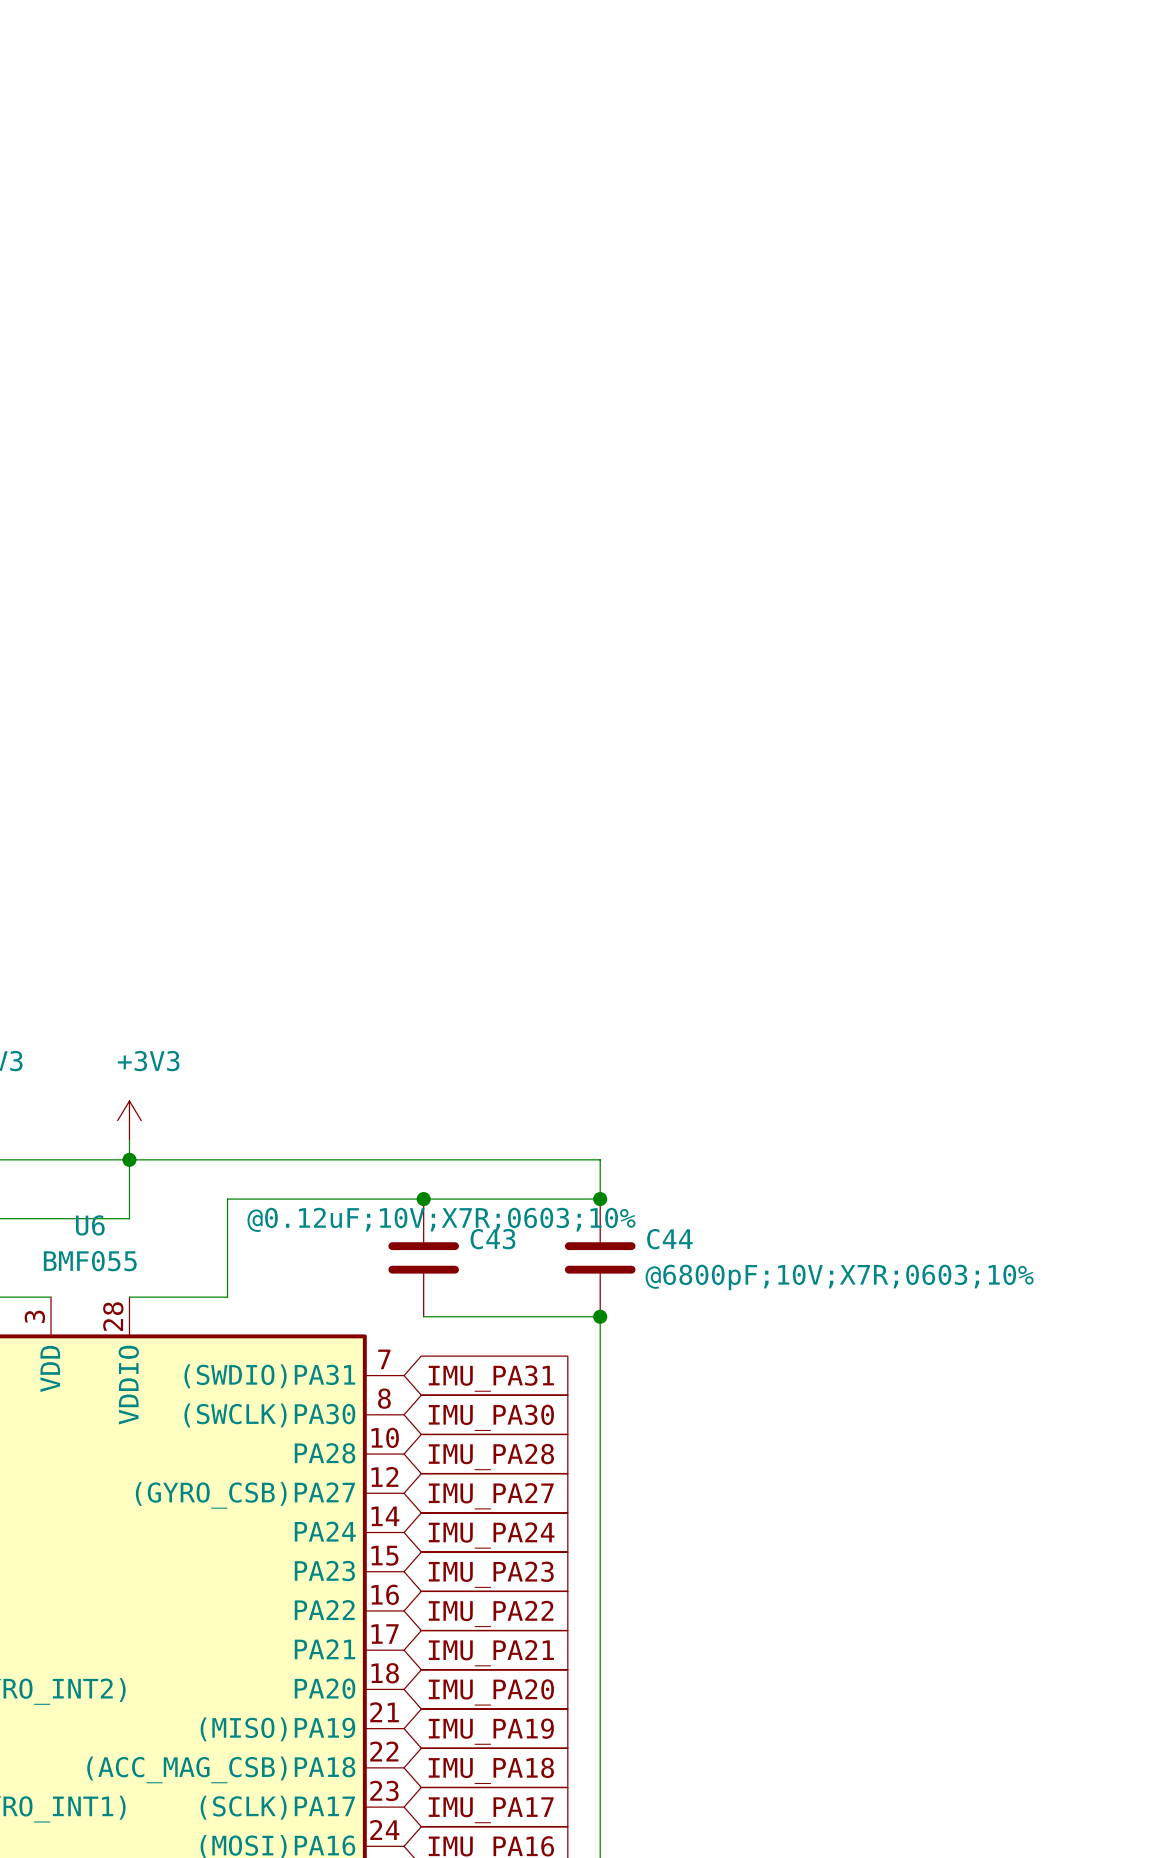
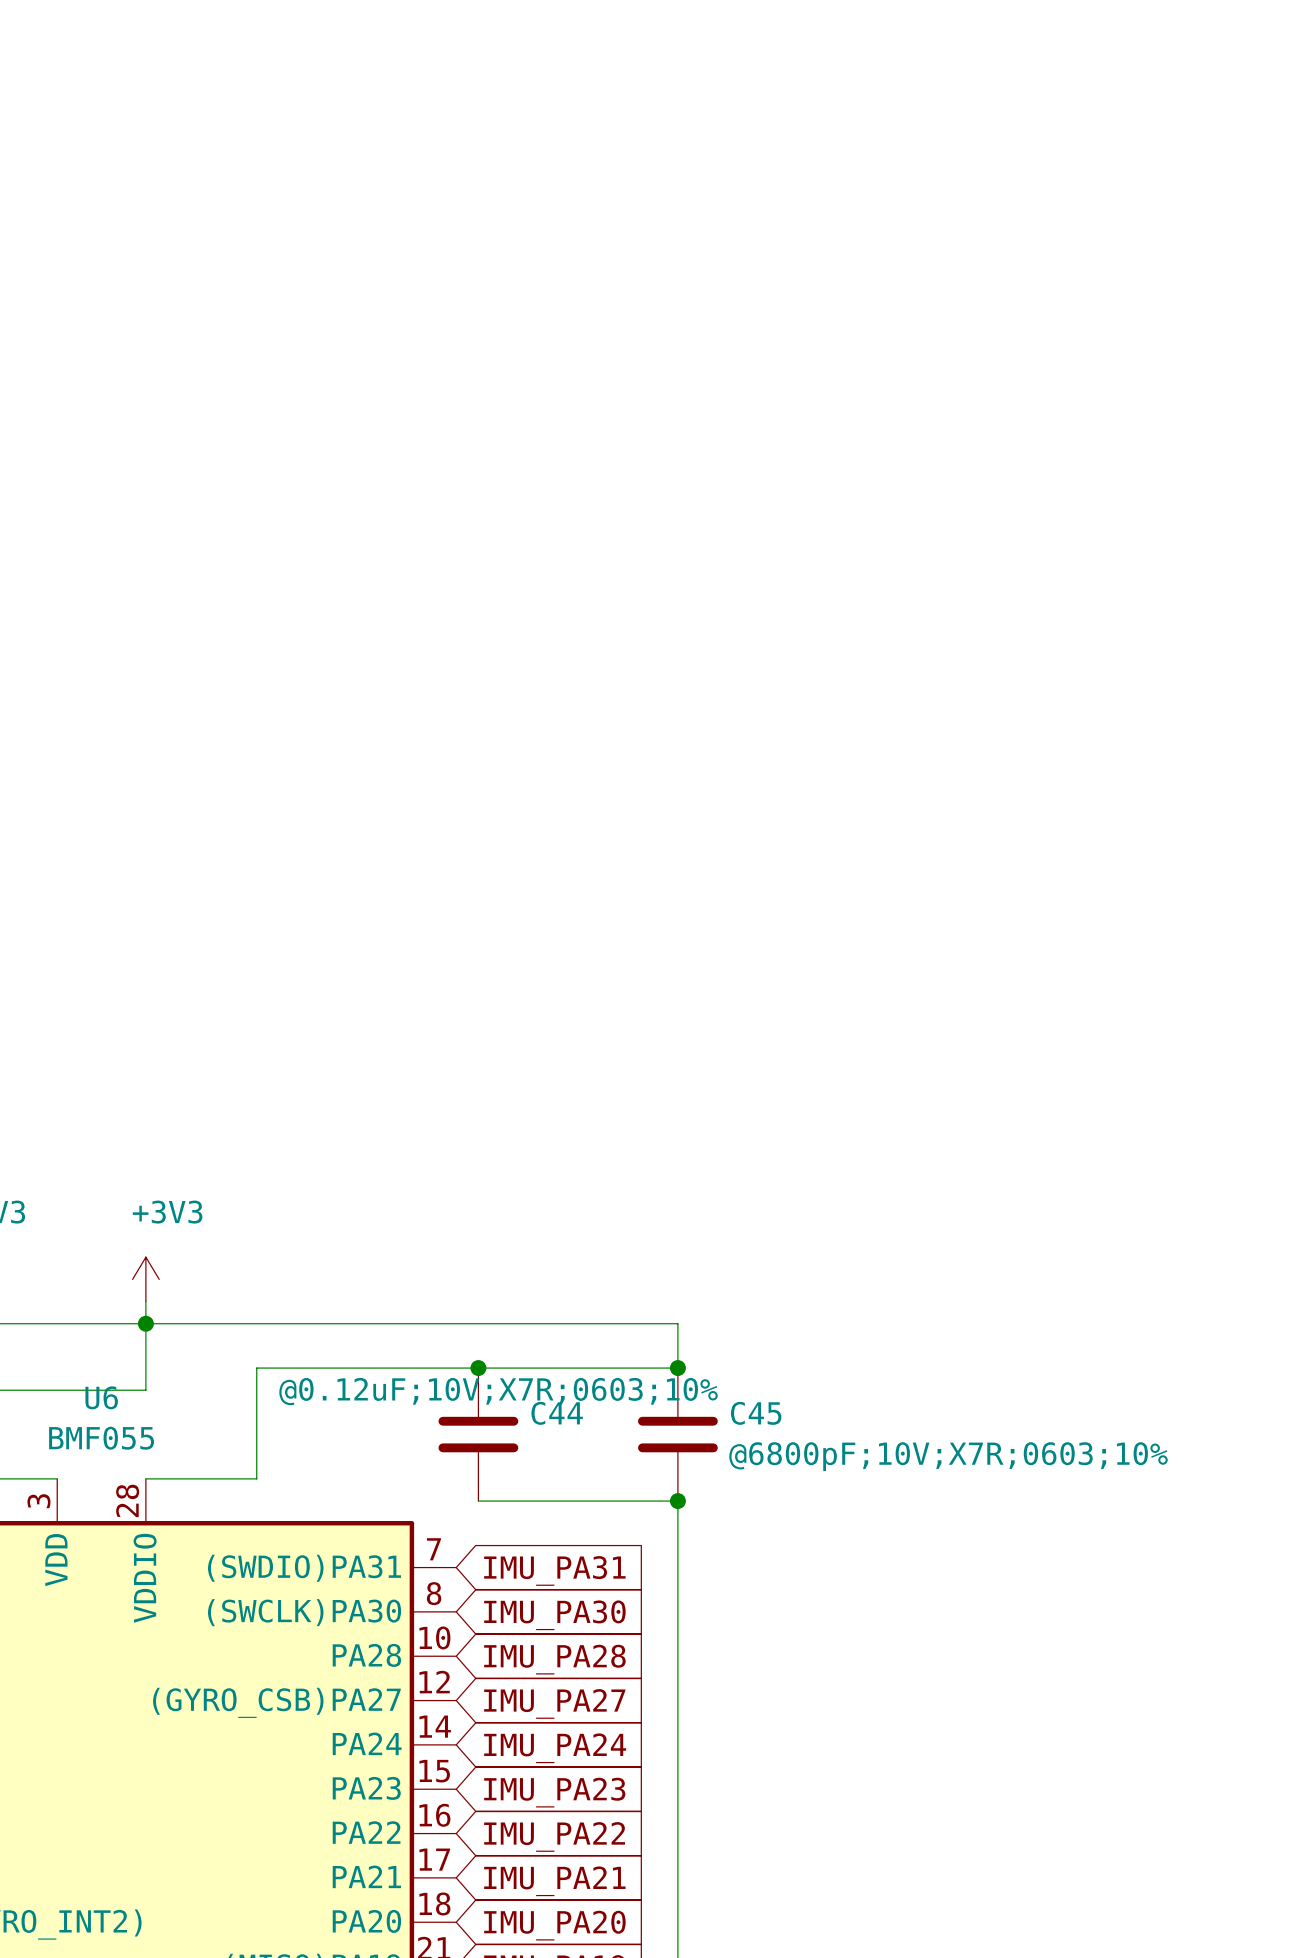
C43 name: C43 (492, 1239) -> C44 (557, 1413)
C44 name: C44 (669, 1239) -> C45 (756, 1413)

